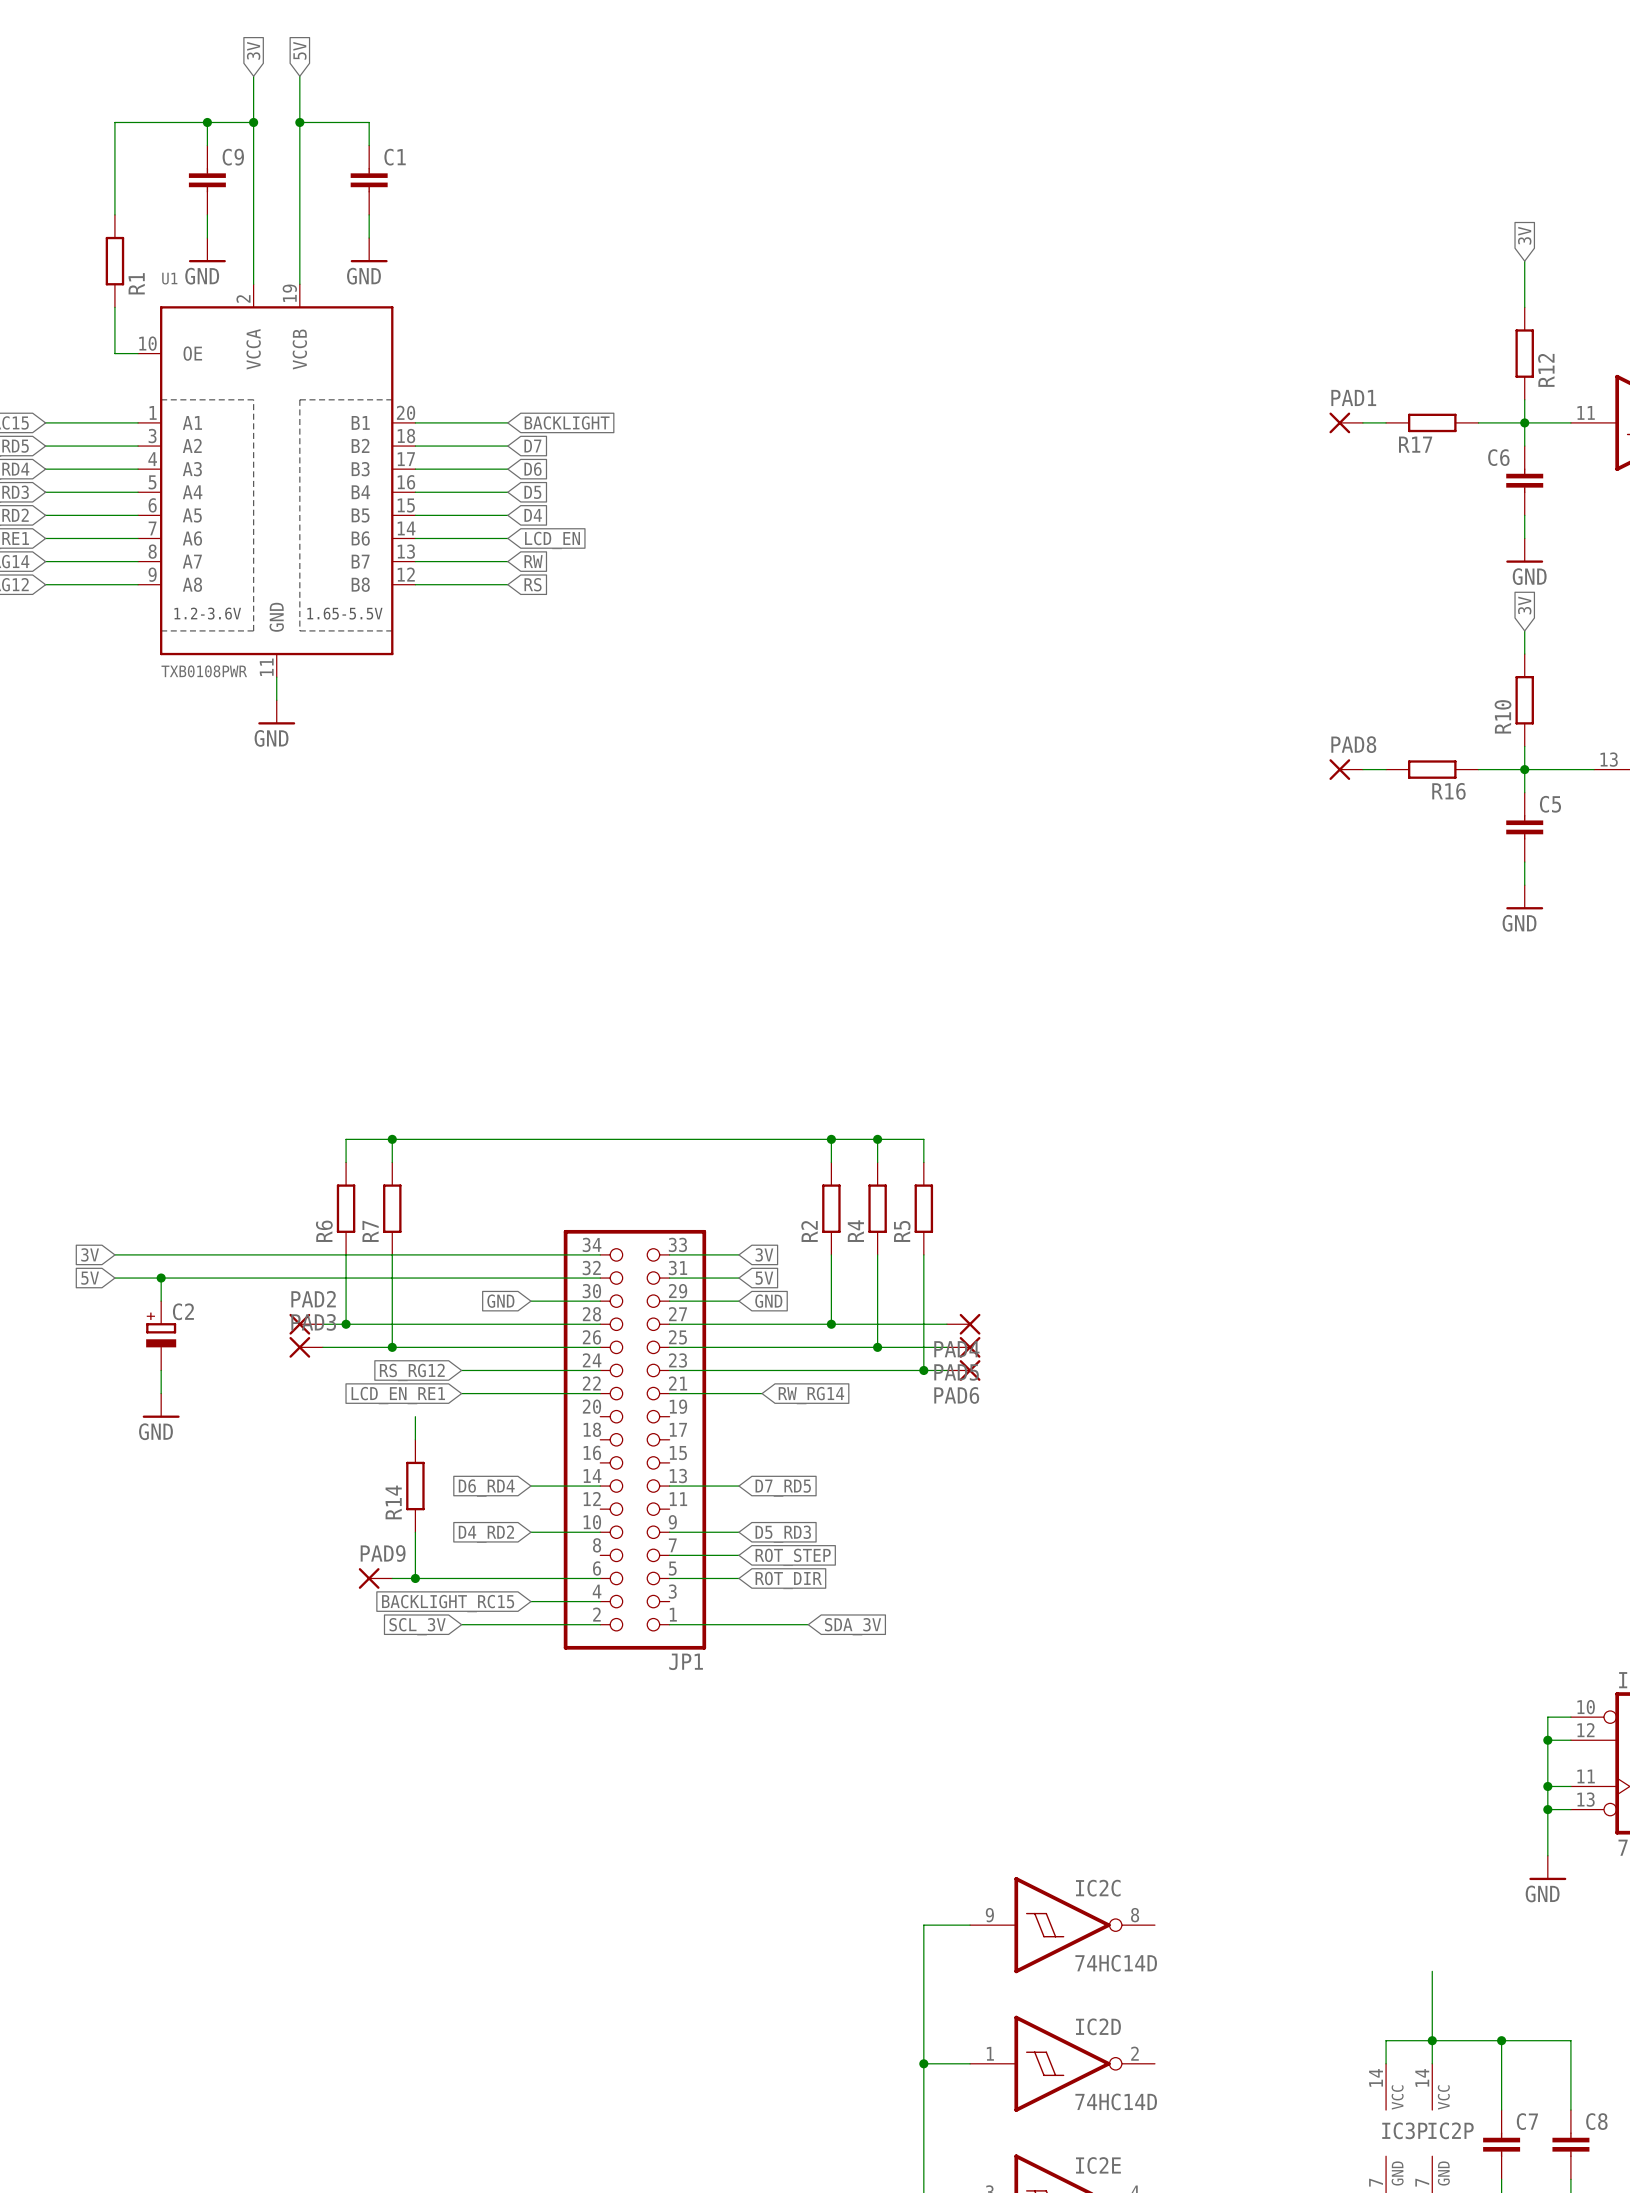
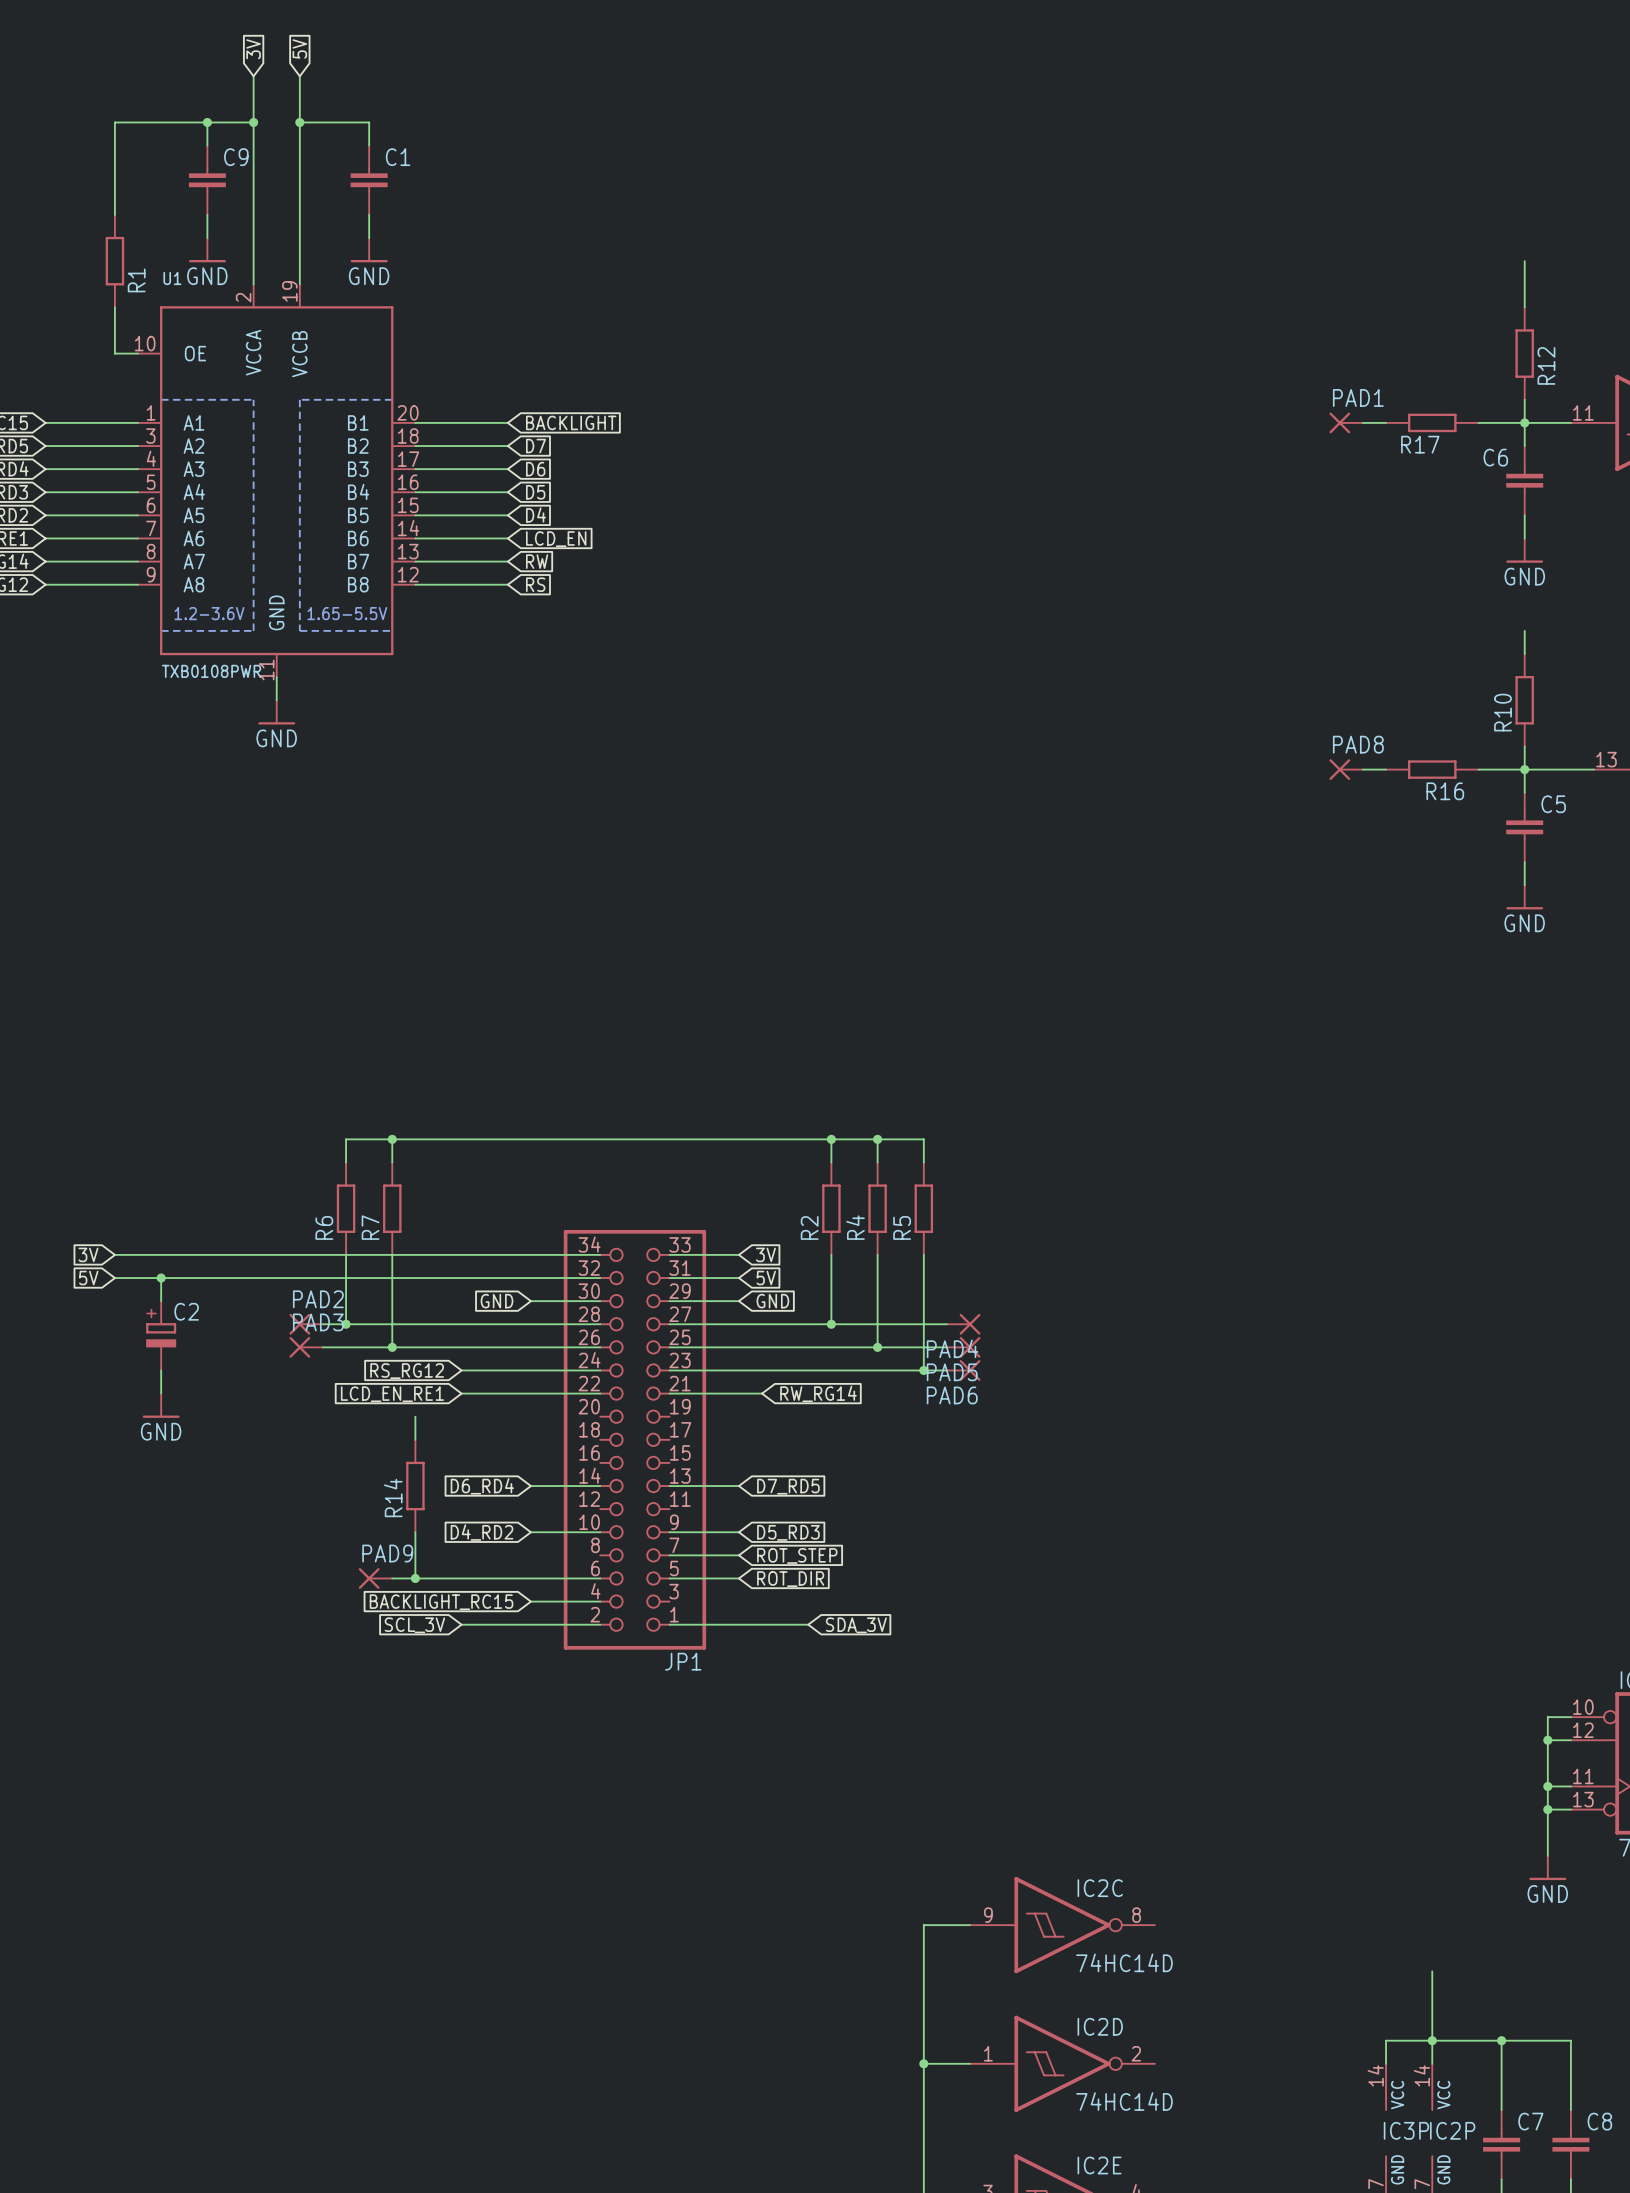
global label: 3V (1524, 235) -> none
global label: 3V (1524, 605) -> none

